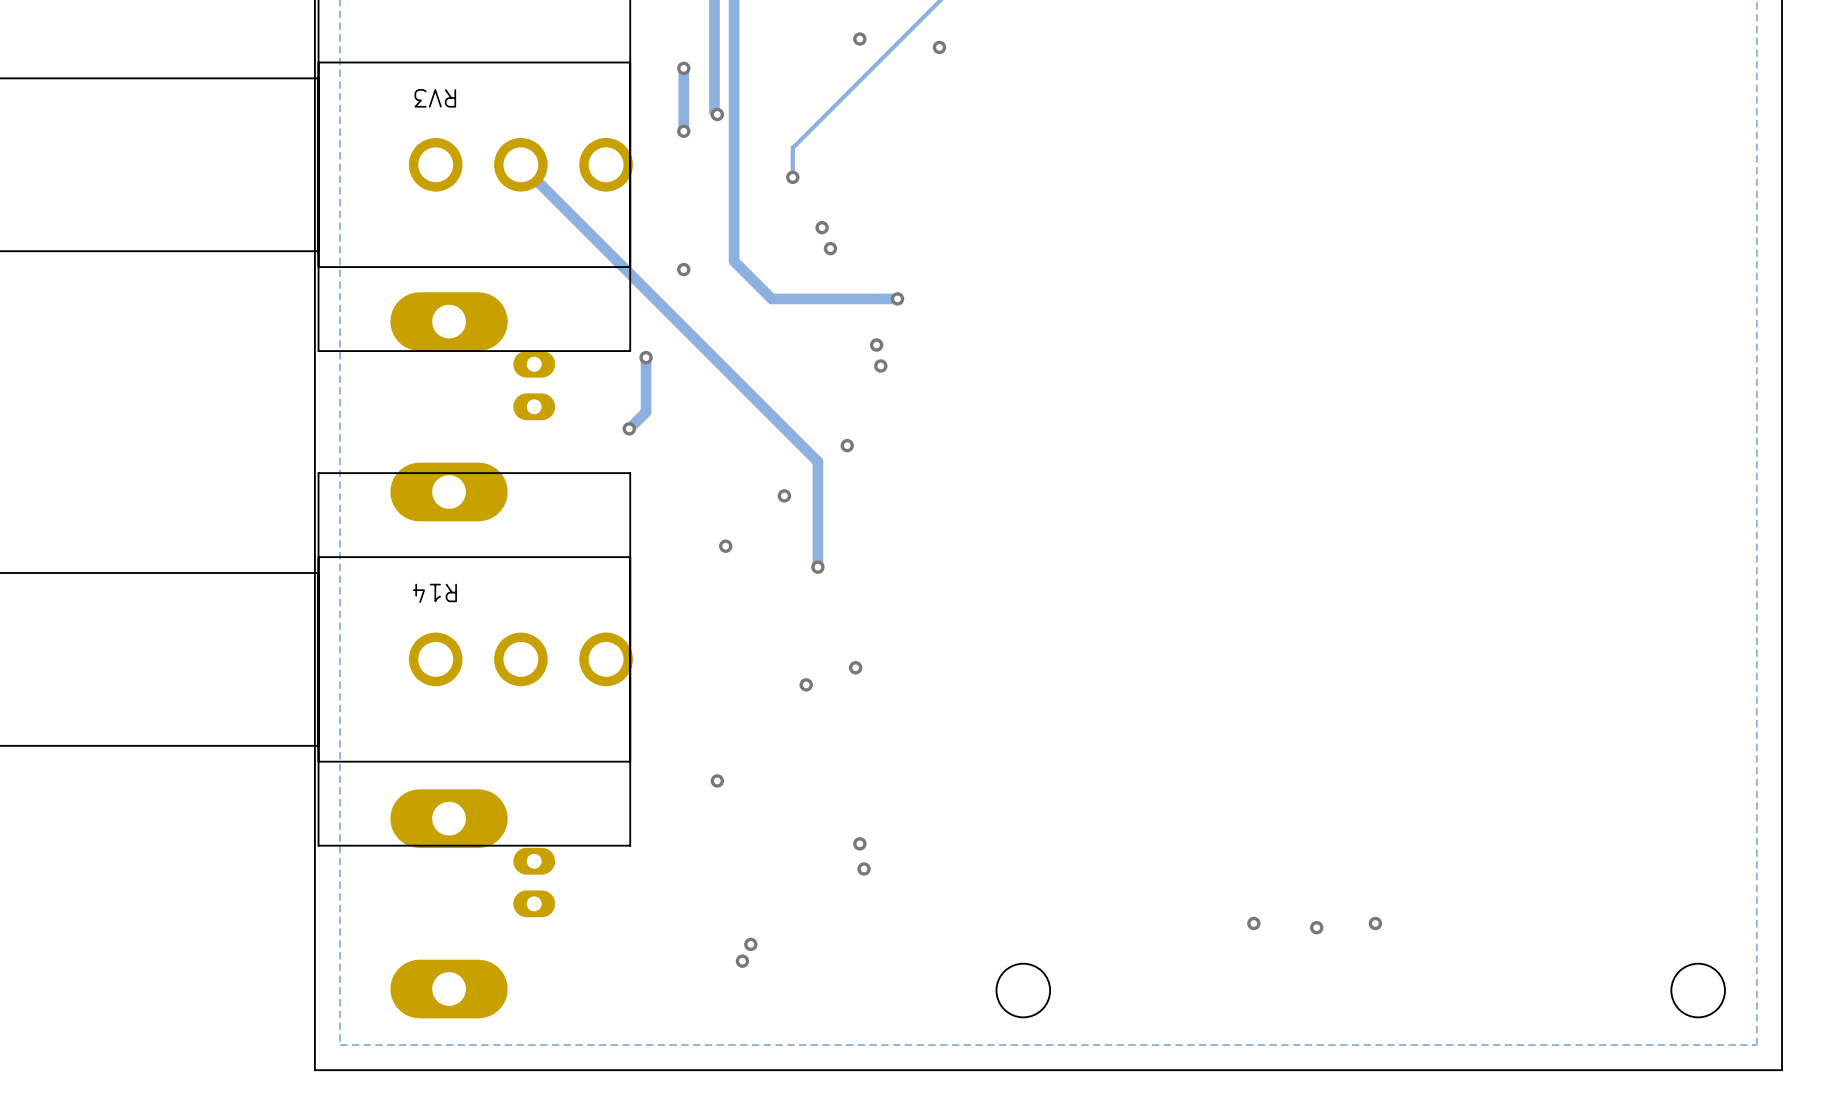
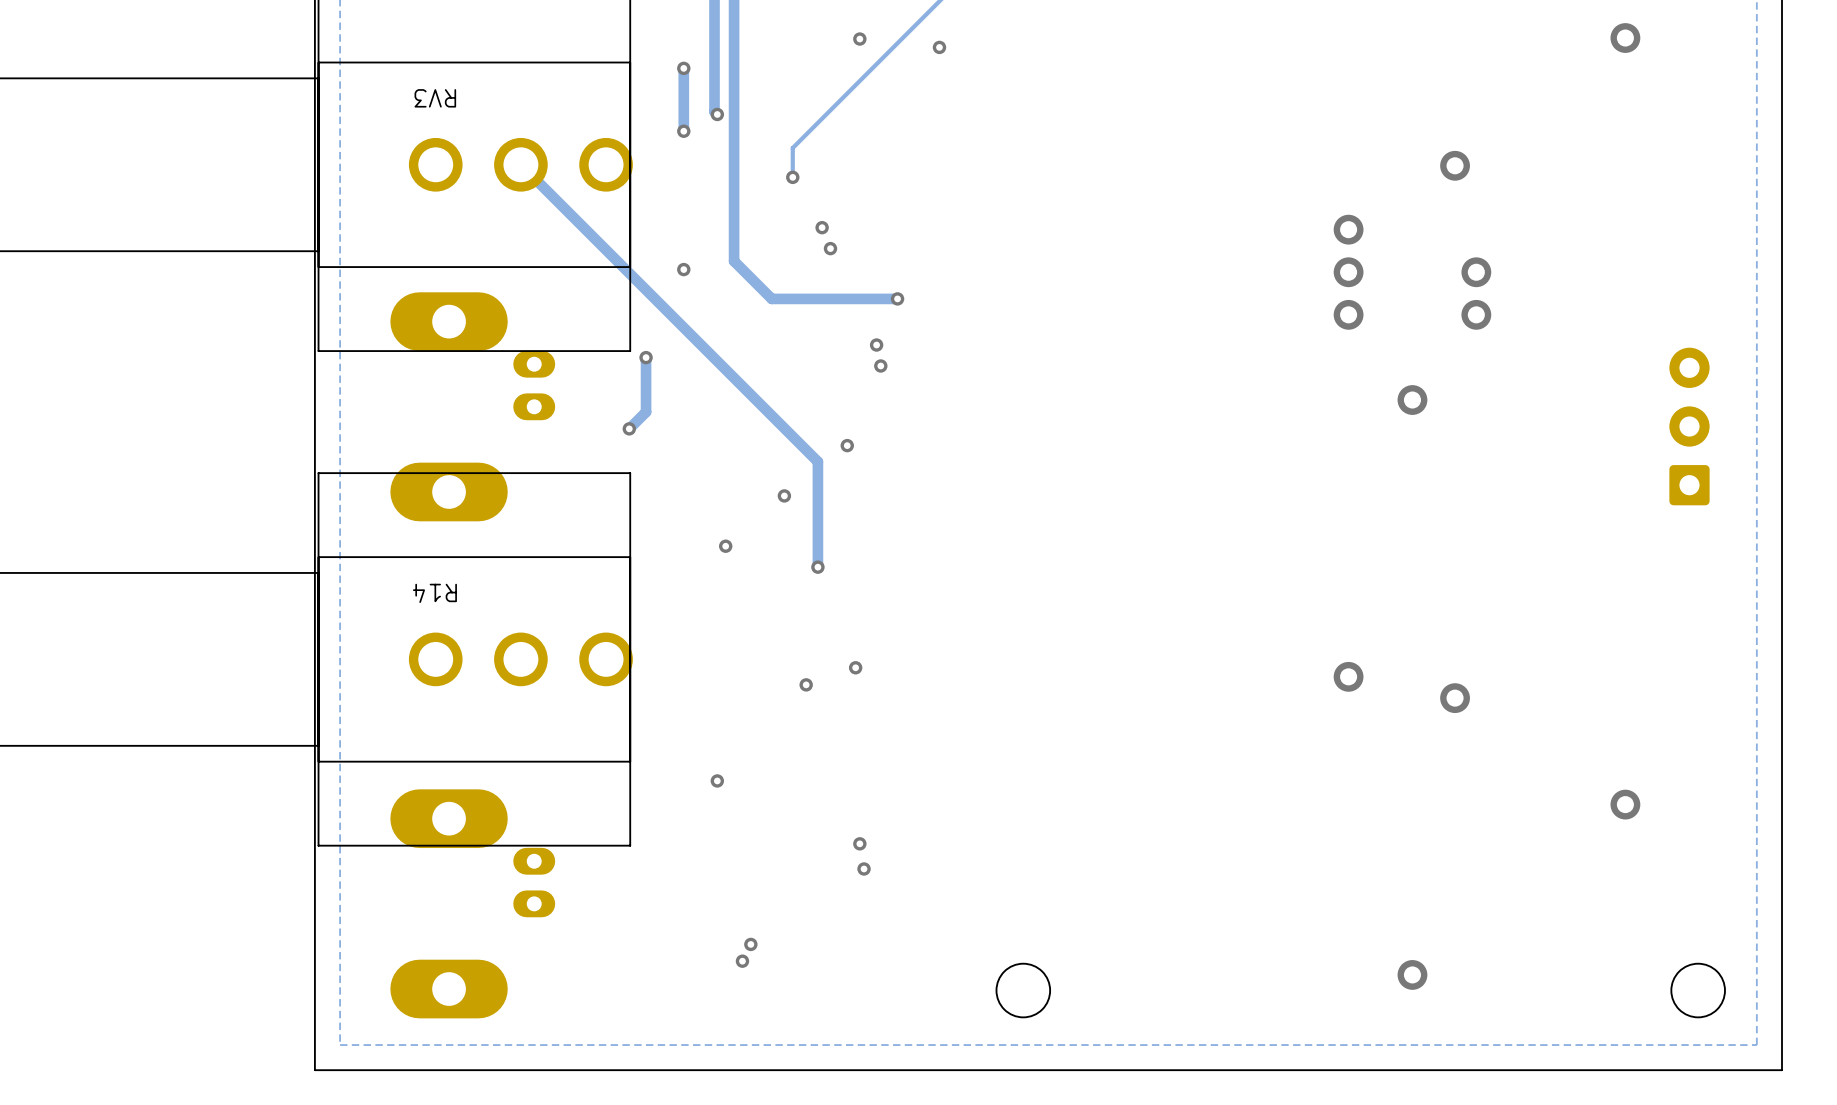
via: none -> (1625, 38)
via: none -> (1455, 165)
via: none -> (1348, 229)
via: none -> (1348, 272)
via: none -> (1476, 272)
via: none -> (1348, 314)
via: none -> (1476, 314)
via: none -> (1412, 400)
part: none -> (1689, 426)
via: none -> (1348, 676)
via: none -> (1455, 698)
via: none -> (1625, 804)
via: (1253, 923) -> none
via: (1375, 923) -> none
via: (1316, 927) -> none
via: none -> (1412, 974)

